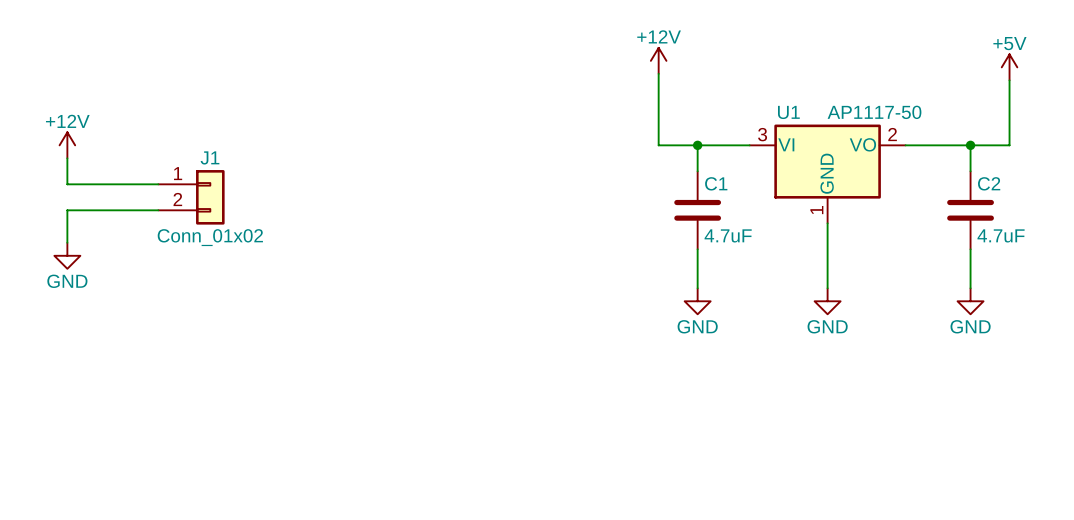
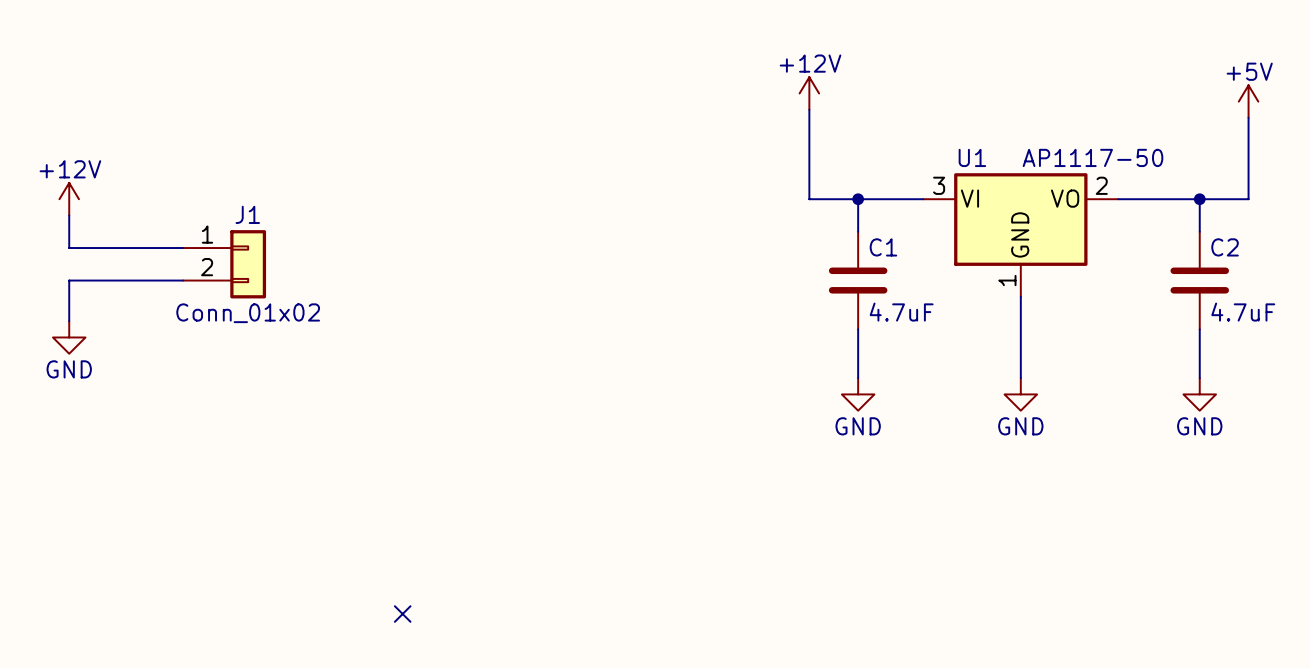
no-connect mark: none -> (402, 614)

